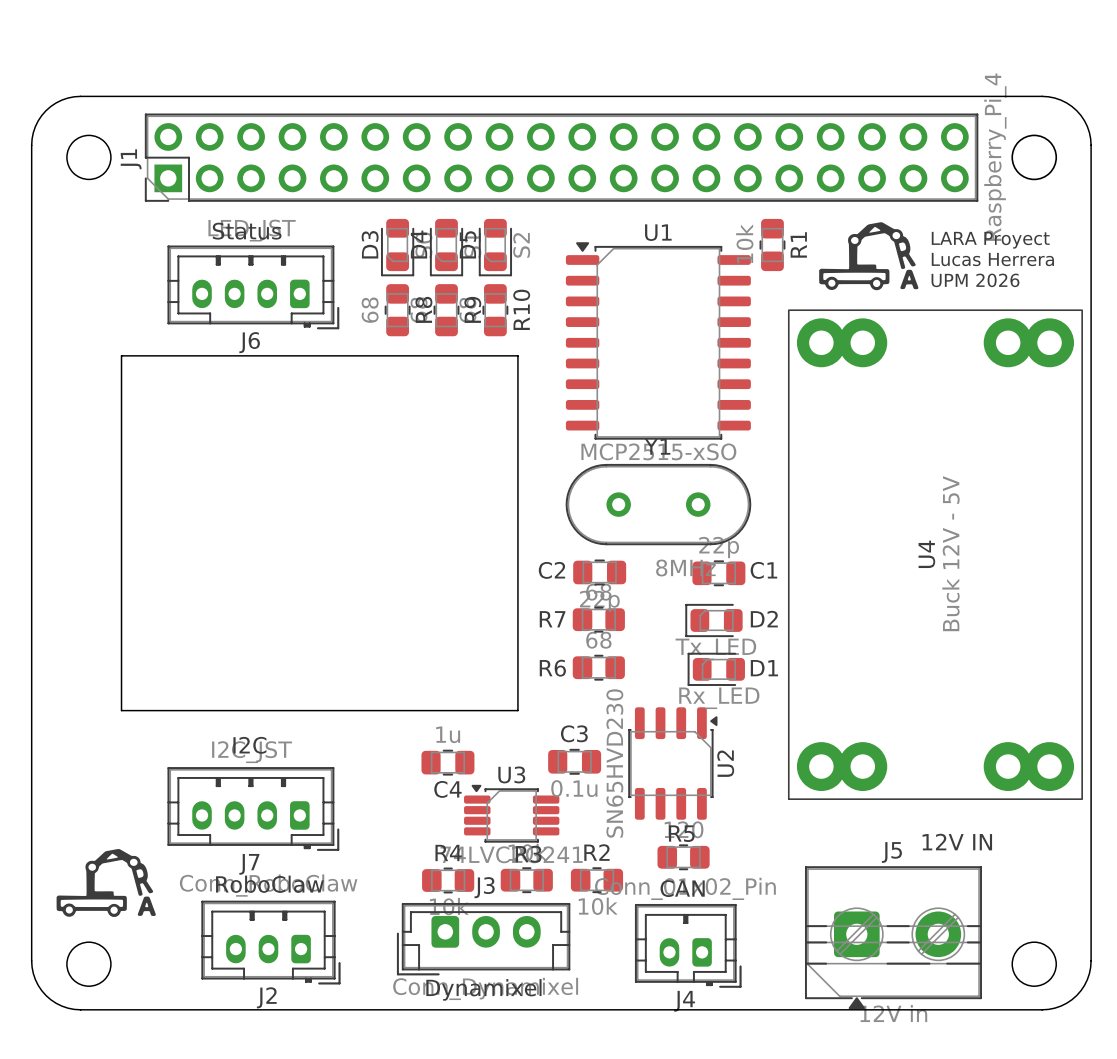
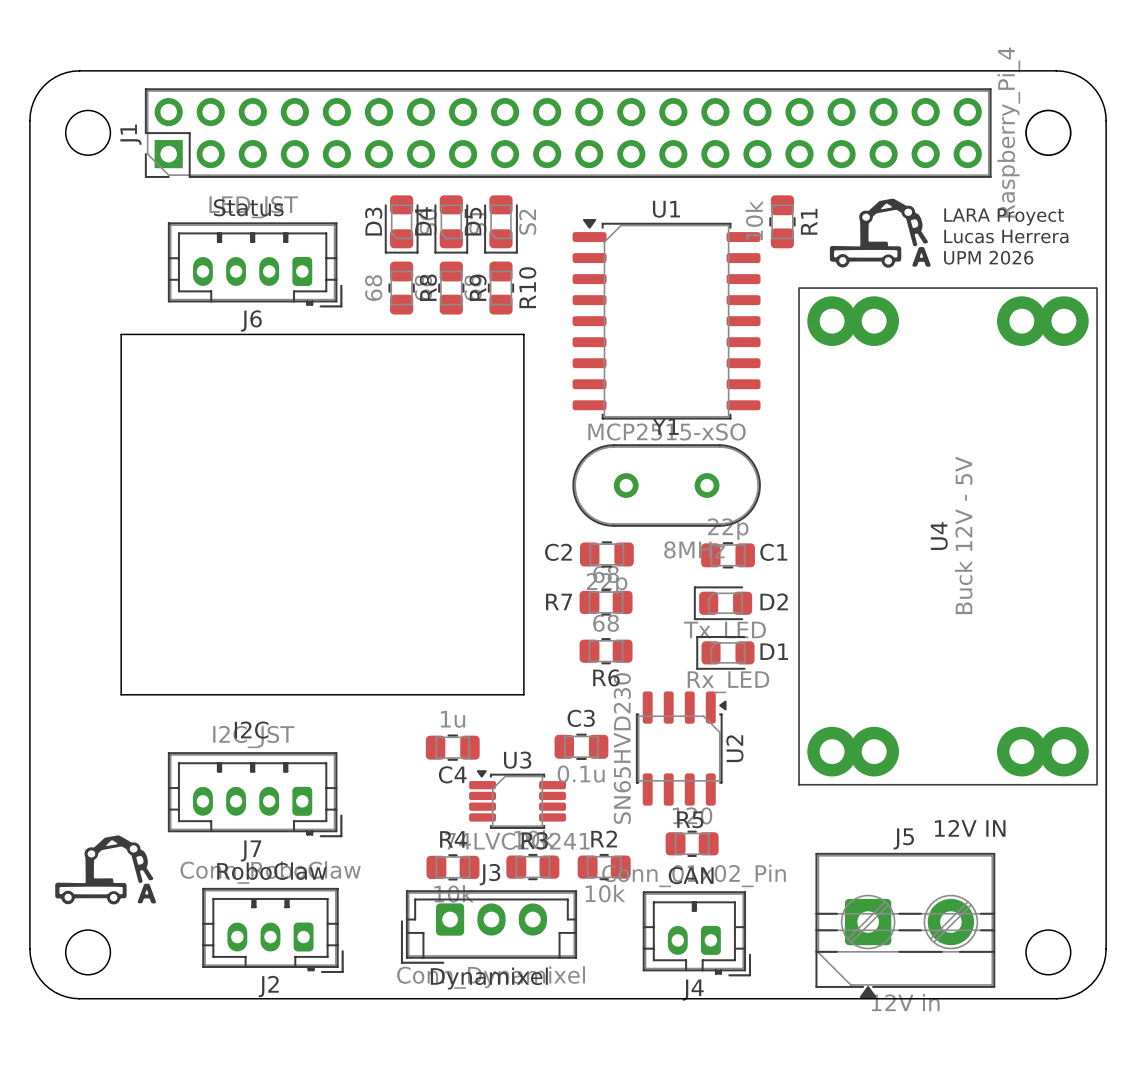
R6 name position: R6 (552, 668) -> R6 (606, 677)

